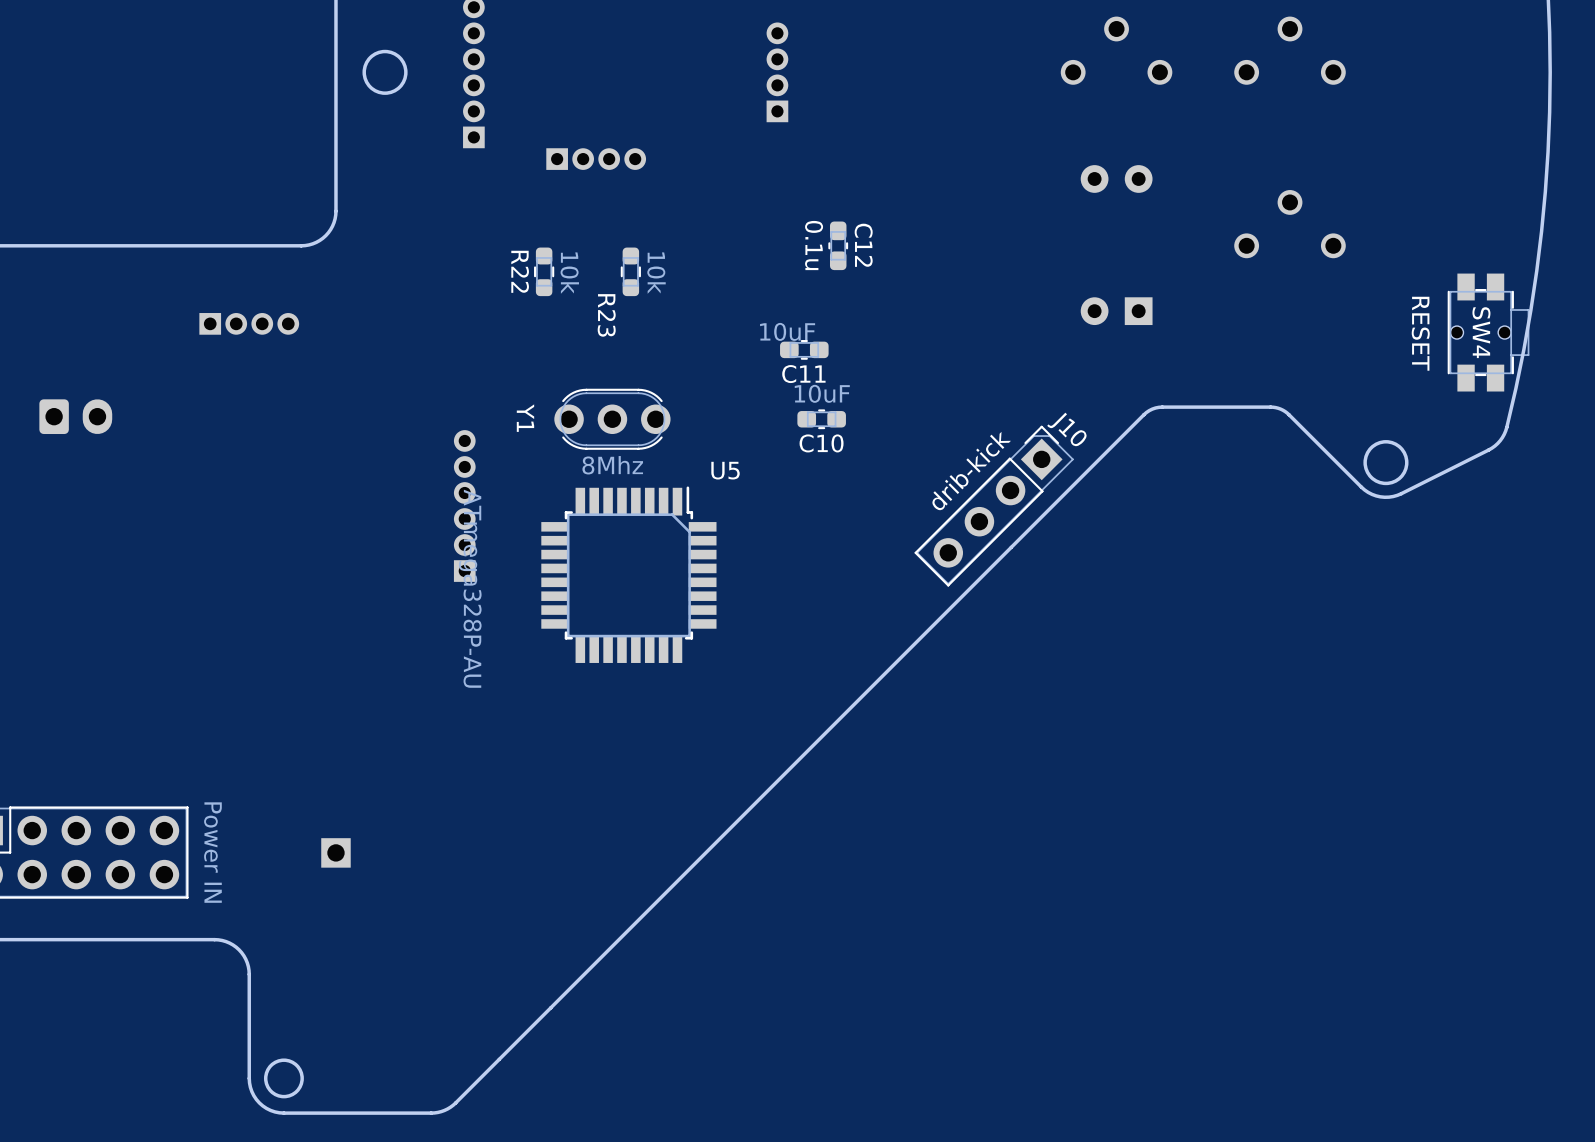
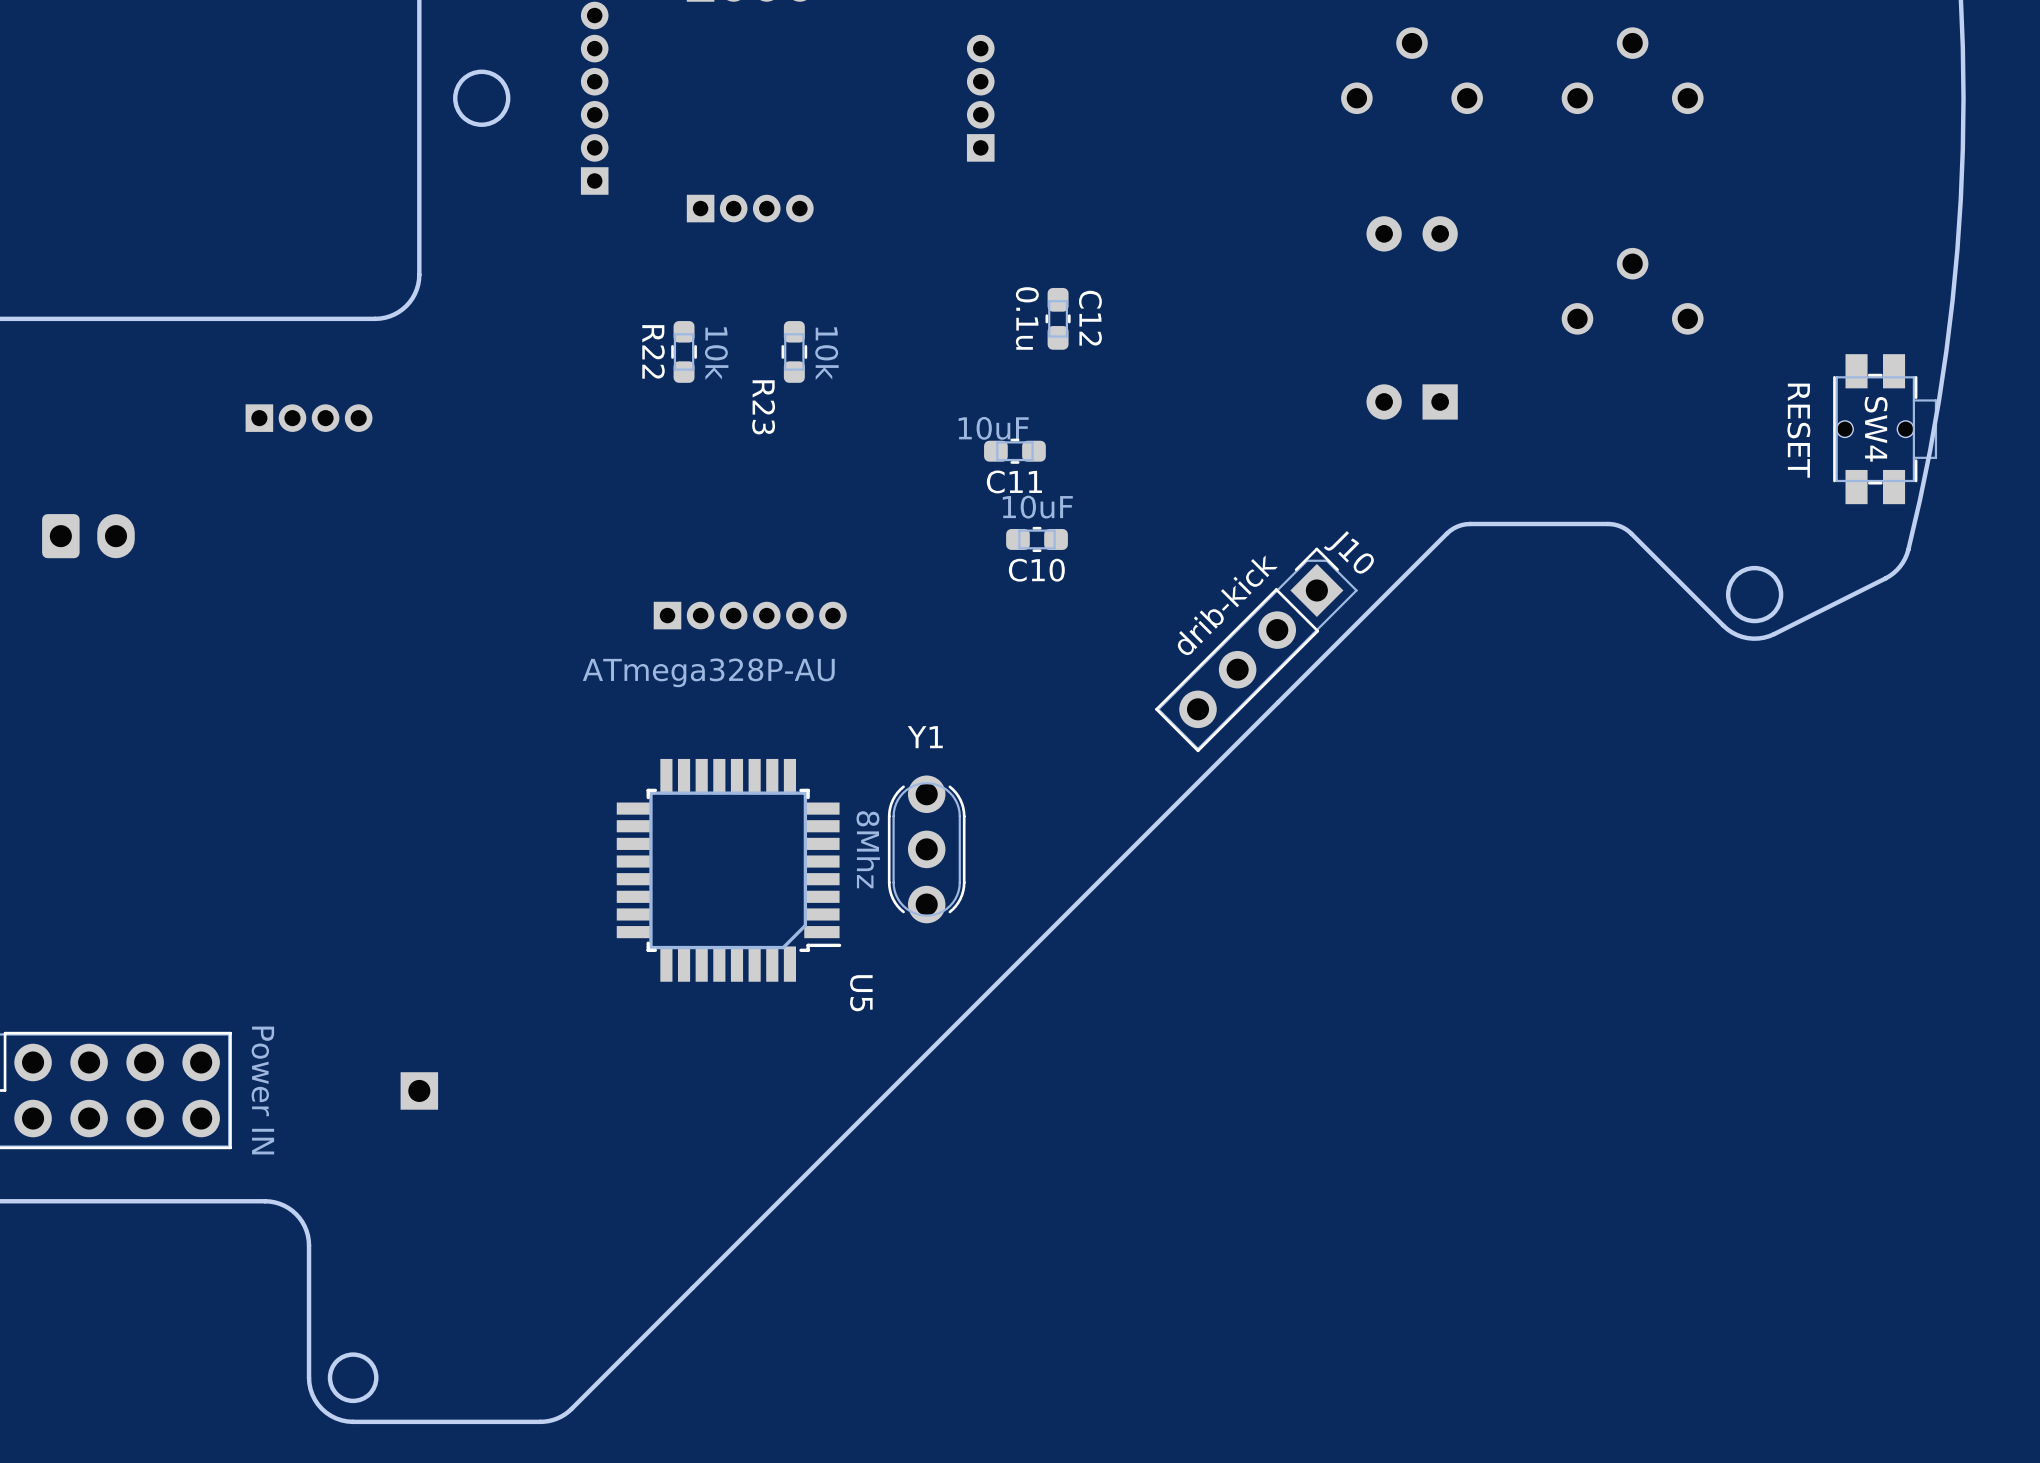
Y1 rotation: 0° (612, 419) -> 90° clockwise (926, 849)
Y1 position: (612, 419) -> (926, 849)
part rotation: 0° (464, 506) -> 90° clockwise (750, 615)
part position: (464, 506) -> (750, 615)
U5 rotation: 0° (628, 574) -> 90° clockwise (728, 870)
U5 position: (628, 574) -> (728, 870)

